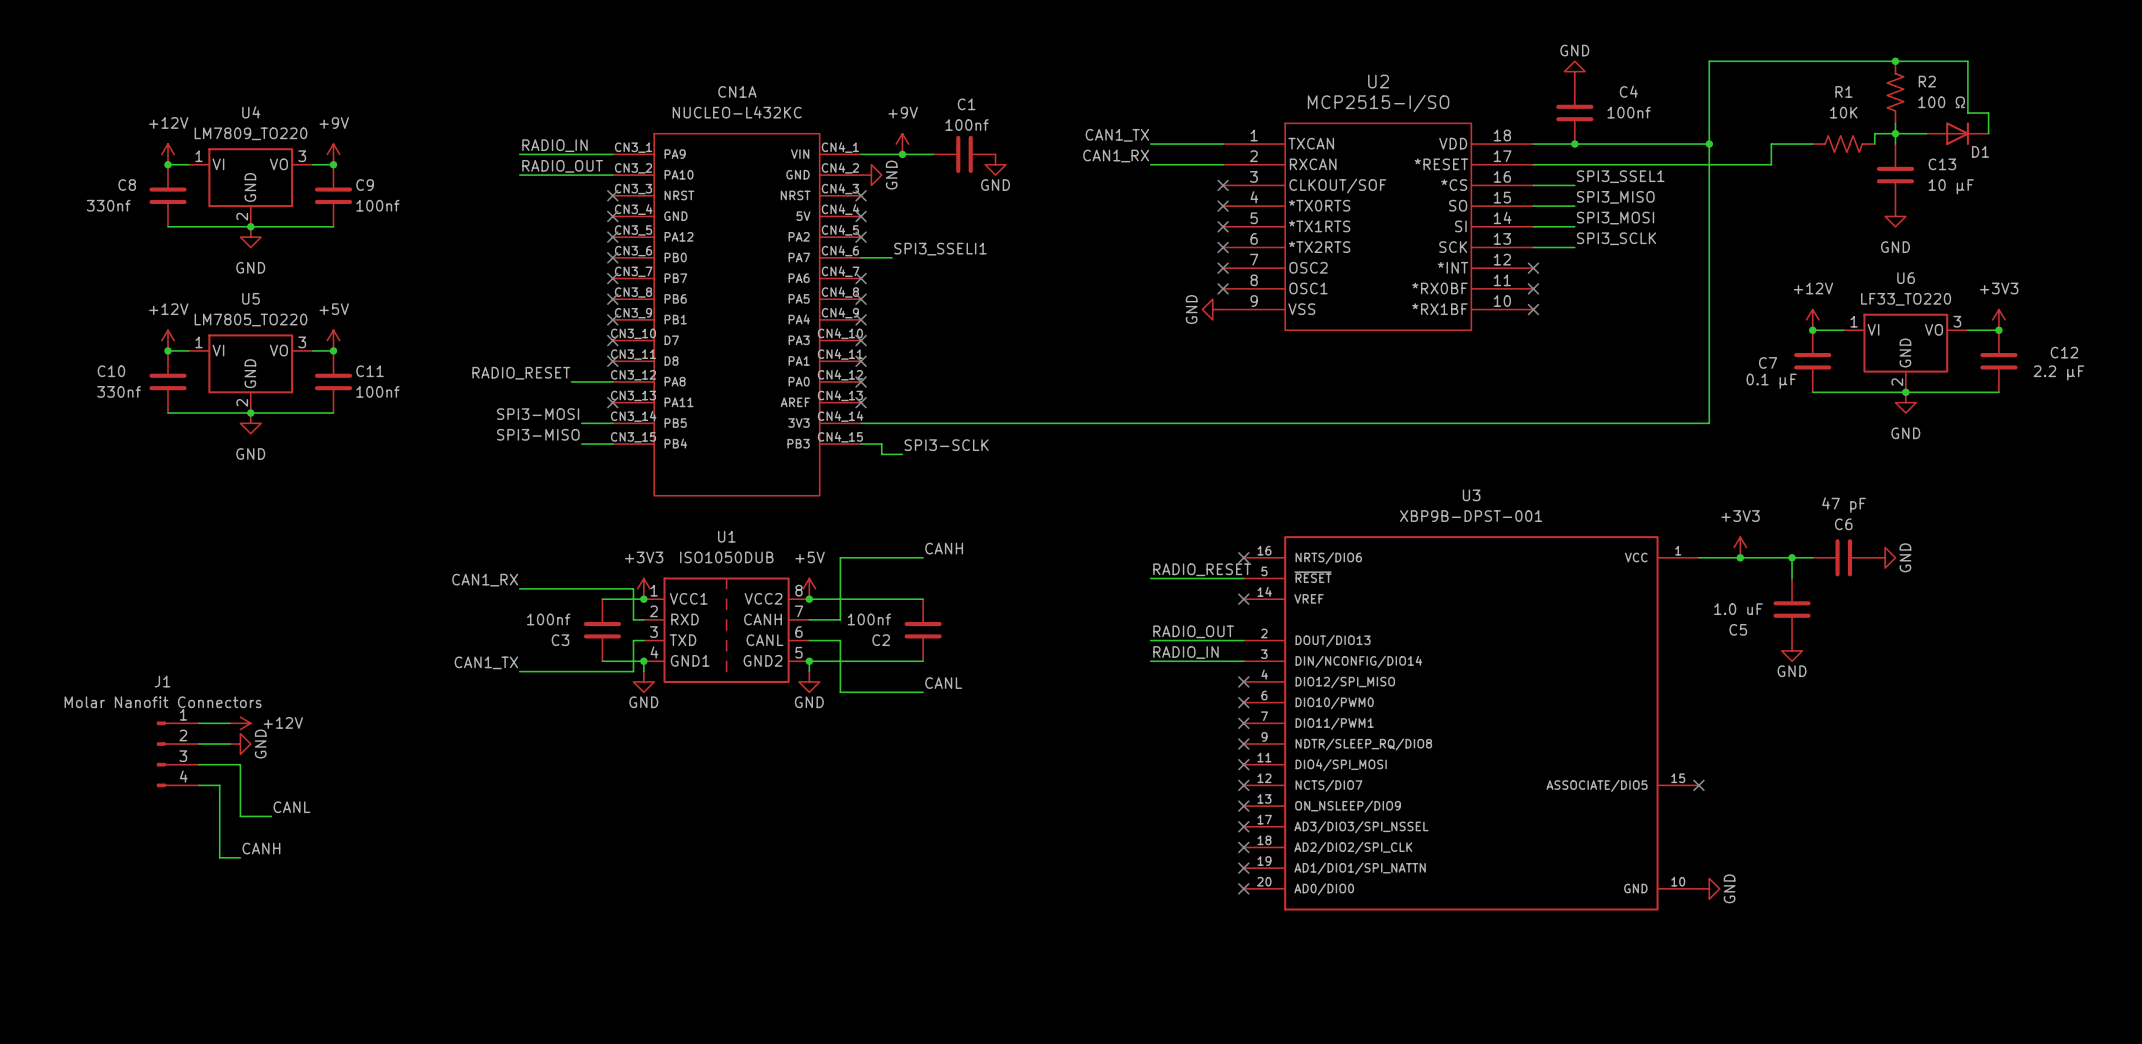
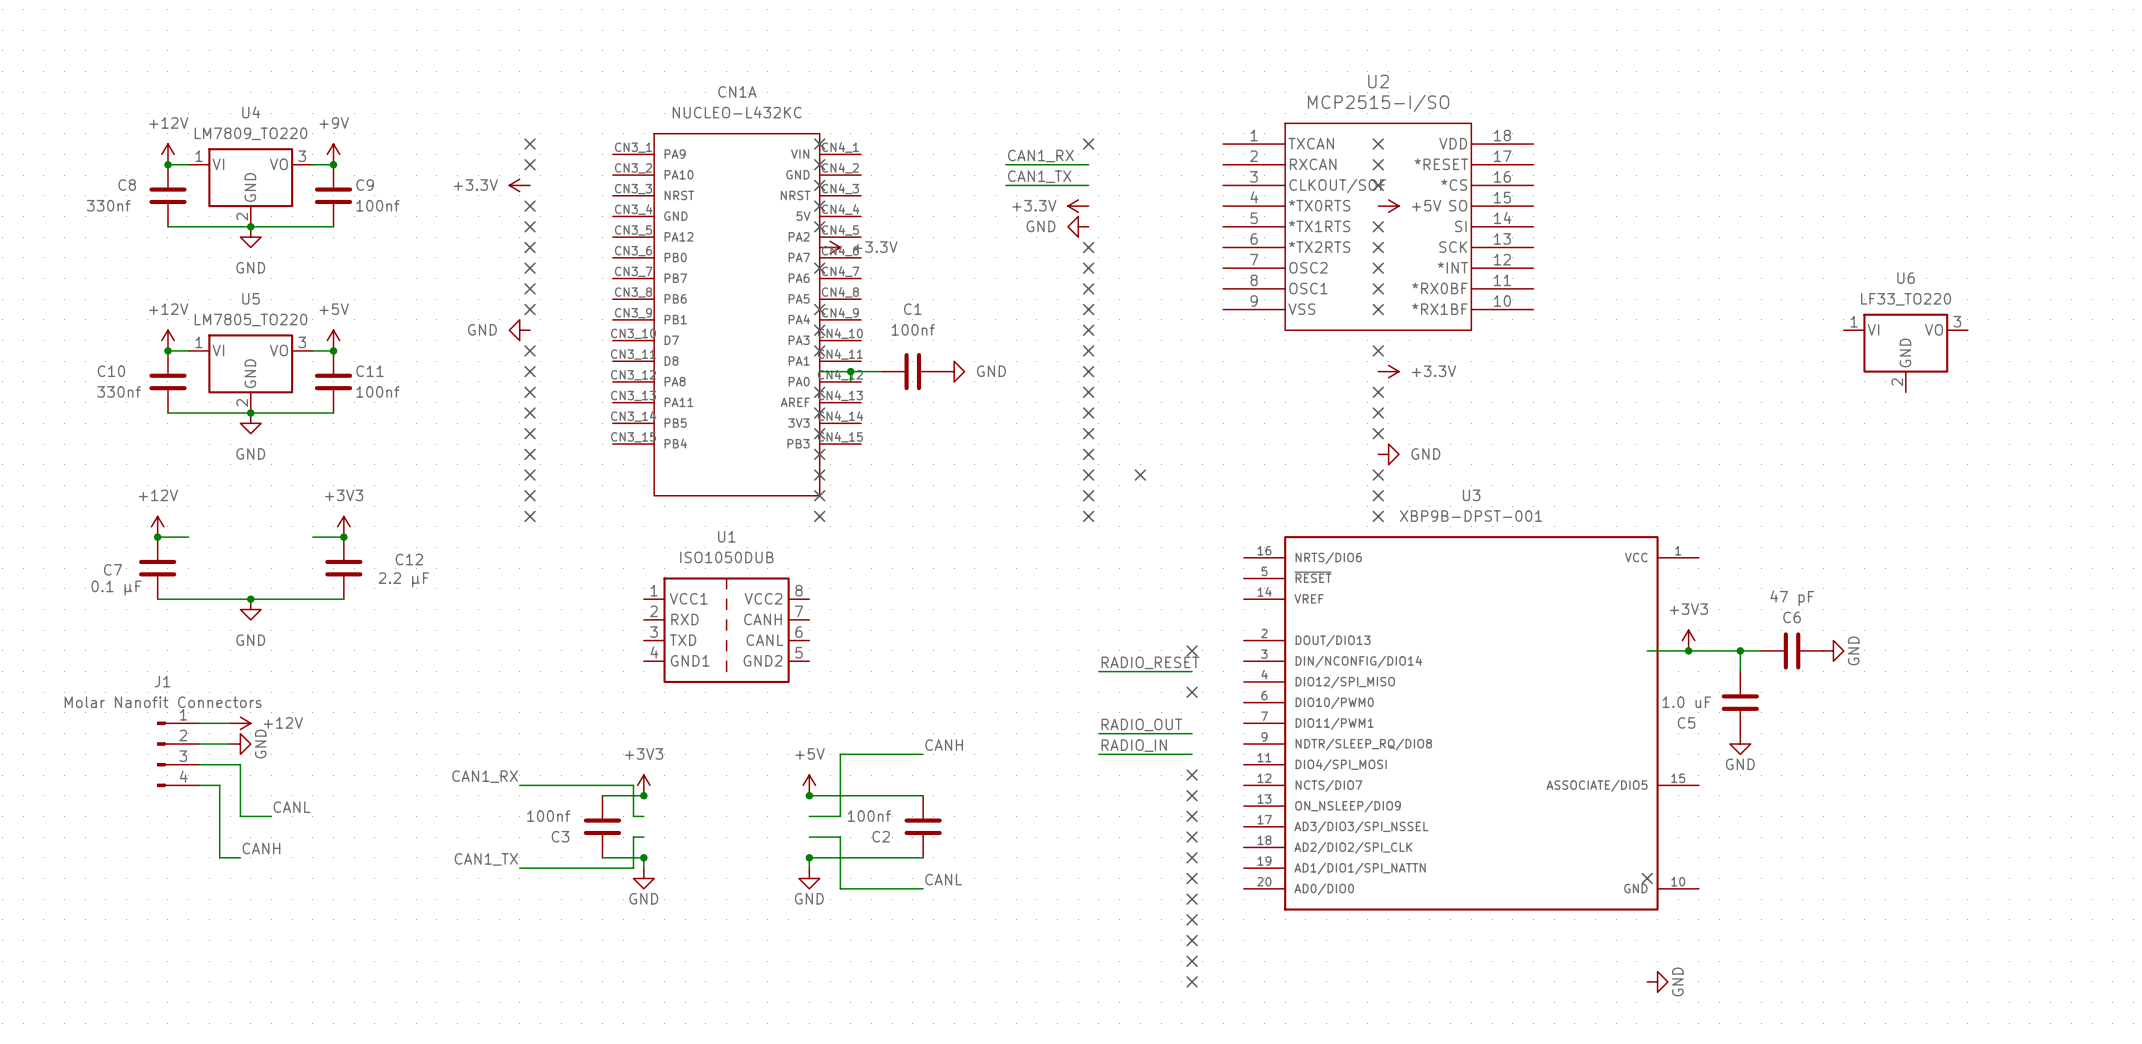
junction: (1895, 61) -> none
power symbol: GND (1574, 71) -> none
R2: 100 Ω (1895, 92) -> none
C1 name position: C1 (966, 104) -> C1 (912, 309)
C4: 100nf (1574, 113) -> none
wire: (1895, 123) (1895, 144) -> none
C1 value position: 100nf (967, 125) -> 100nf (913, 329)
junction: (1895, 133) -> none
wire: (1926, 133) (1874, 133) (1874, 144) -> none
D1: (1957, 133) -> none
wire: (1988, 133) (1988, 113) (1967, 113) (1967, 61) (1709, 61) (1709, 423) (861, 423) -> none
label position: CAN1_TX (1117, 135) -> CAN1_TX (1039, 176)
no-connect mark: none -> (530, 144)
no-connect mark: none -> (819, 144)
power symbol: +9V (902, 144) -> none
no-connect mark: none -> (1088, 144)
wire: (1150, 144) (1223, 144) -> none
no-connect mark: none -> (1378, 144)
wire: (1533, 144) (1709, 144) -> none
junction: (1574, 144) -> none
junction: (1709, 144) -> none
wire: (1812, 144) (1771, 144) (1771, 164) (1533, 164) -> none
R1: 10K (1843, 144) -> none
label: RADIO_IN (555, 145) -> none
wire: (519, 154) (612, 154) -> none
wire: (861, 154) (933, 154) -> none
junction: (902, 154) -> none
C1 position: (964, 154) -> (912, 371)
label position: CAN1_RX (1116, 156) -> CAN1_RX (1040, 156)
no-connect mark: none -> (530, 164)
no-connect mark: none -> (819, 164)
power symbol: GND (995, 164) -> none
wire: none -> (1005, 164) (1088, 164)
wire: (1150, 164) (1223, 164) -> none
no-connect mark: none -> (1378, 164)
label: RADIO_OUT (562, 166) -> none
wire: (519, 175) (612, 175) -> none
power symbol: GND (871, 175) -> none
C13: 10 µF (1895, 175) -> none
label: SPI3_SSEL1 (1620, 176) -> none
power symbol: none -> +3.3V (519, 185)
no-connect mark: none -> (819, 185)
wire: none -> (1005, 185) (1088, 185)
no-connect mark: (1223, 185) -> none
no-connect mark: none -> (1378, 185)
wire: (1533, 185) (1574, 185) -> none
no-connect mark: (612, 195) -> none
no-connect mark: (861, 195) -> none
label: SPI3_MISO (1615, 197) -> none
no-connect mark: none -> (530, 206)
no-connect mark: none -> (819, 206)
power symbol: none -> +3.3V (1078, 206)
no-connect mark: (1223, 206) -> none
power symbol: none -> +5V (1388, 206)
wire: (1533, 206) (1574, 206) -> none
no-connect mark: (612, 216) -> none
no-connect mark: (861, 216) -> none
power symbol: GND (1895, 216) -> none
label: SPI3_MOSI (1615, 218) -> none
no-connect mark: none -> (530, 226)
no-connect mark: none -> (819, 226)
power symbol: none -> GND (1078, 226)
no-connect mark: (1223, 226) -> none
no-connect mark: none -> (1378, 226)
wire: (1533, 226) (1574, 226) -> none
no-connect mark: (612, 237) -> none
no-connect mark: (861, 237) -> none
label: SPI3_SCLK (1616, 238) -> none
no-connect mark: none -> (530, 247)
power symbol: none -> +3.3V (830, 247)
no-connect mark: none -> (1088, 247)
no-connect mark: (1223, 247) -> none
no-connect mark: none -> (1378, 247)
wire: (1533, 247) (1574, 247) -> none
label: SPI3_SSELI1 (940, 249) -> none
no-connect mark: (612, 257) -> none
wire: (861, 257) (892, 257) -> none
no-connect mark: none -> (530, 268)
no-connect mark: none -> (819, 268)
no-connect mark: none -> (1088, 268)
no-connect mark: (1223, 268) -> none
no-connect mark: none -> (1378, 268)
no-connect mark: (1533, 268) -> none
no-connect mark: (612, 278) -> none
no-connect mark: (861, 278) -> none
no-connect mark: none -> (530, 288)
no-connect mark: none -> (1088, 288)
no-connect mark: (1223, 288) -> none
no-connect mark: none -> (1378, 288)
no-connect mark: (1533, 288) -> none
no-connect mark: (612, 299) -> none
no-connect mark: (861, 299) -> none
no-connect mark: none -> (530, 309)
no-connect mark: none -> (819, 309)
no-connect mark: none -> (1088, 309)
power symbol: GND (1212, 309) -> none
no-connect mark: none -> (1378, 309)
no-connect mark: (1533, 309) -> none
no-connect mark: (612, 319) -> none
no-connect mark: (861, 319) -> none
power symbol: +12V (1812, 319) -> none
power symbol: +3V3 (1998, 319) -> none
power symbol: none -> GND (519, 330)
no-connect mark: none -> (819, 330)
no-connect mark: none -> (1088, 330)
wire: (1812, 330) (1843, 330) -> none
junction: (1812, 330) -> none
wire: (1967, 330) (1998, 330) -> none
junction: (1998, 330) -> none
no-connect mark: (612, 340) -> none
no-connect mark: (861, 340) -> none
no-connect mark: none -> (530, 350)
no-connect mark: none -> (819, 350)
no-connect mark: none -> (1088, 350)
no-connect mark: none -> (1378, 350)
no-connect mark: (612, 361) -> none
no-connect mark: (861, 361) -> none
C7 position: (1812, 361) -> (157, 568)
C12 position: (1998, 361) -> (343, 568)
no-connect mark: none -> (530, 371)
wire: none -> (819, 371) (881, 371)
wire: none -> (850, 371) (850, 381)
junction: none -> (850, 371)
power symbol: none -> GND (954, 371)
no-connect mark: none -> (1088, 371)
power symbol: none -> +3.3V (1388, 371)
label: RADIO_RESET (521, 373) -> none
wire: (571, 381) (612, 381) -> none
no-connect mark: (861, 381) -> none
no-connect mark: none -> (530, 392)
no-connect mark: none -> (819, 392)
no-connect mark: none -> (1088, 392)
no-connect mark: none -> (1378, 392)
wire: (1812, 392) (1998, 392) -> none
junction: (1905, 392) -> none
no-connect mark: (612, 402) -> none
no-connect mark: (861, 402) -> none
power symbol: GND (1905, 402) -> none
no-connect mark: none -> (530, 413)
no-connect mark: none -> (819, 413)
no-connect mark: none -> (1088, 413)
no-connect mark: none -> (1378, 413)
label: SPI3-MOSI (538, 414) -> none
wire: (581, 423) (612, 423) -> none
no-connect mark: none -> (530, 433)
no-connect mark: none -> (819, 433)
no-connect mark: none -> (1088, 433)
no-connect mark: none -> (1378, 433)
label: SPI3-MISO (538, 434) -> none
wire: (581, 444) (612, 444) -> none
wire: (861, 444) (881, 444) (881, 454) (902, 454) -> none
label: SPI3-SCLK (946, 445) -> none
no-connect mark: none -> (530, 454)
no-connect mark: none -> (819, 454)
no-connect mark: none -> (1088, 454)
power symbol: none -> GND (1388, 454)
no-connect mark: none -> (530, 475)
no-connect mark: none -> (819, 475)
no-connect mark: none -> (1088, 475)
no-connect mark: none -> (1140, 475)
no-connect mark: none -> (1378, 475)
no-connect mark: none -> (530, 495)
no-connect mark: none -> (819, 495)
no-connect mark: none -> (1088, 495)
no-connect mark: none -> (1378, 495)
no-connect mark: none -> (530, 516)
no-connect mark: none -> (819, 516)
no-connect mark: none -> (1088, 516)
no-connect mark: none -> (1378, 516)
power symbol: none -> +12V (157, 526)
power symbol: none -> +3V3 (343, 526)
wire: none -> (157, 537) (188, 537)
junction: none -> (157, 537)
wire: none -> (312, 537) (343, 537)
junction: none -> (343, 537)
power symbol position: +3V3 (1740, 547) -> +3V3 (1688, 640)
label position: CANH (944, 548) -> CANH (944, 745)
wire: (923, 557) (840, 557) (840, 619) (809, 619) -> (923, 754) (840, 754) (840, 816) (809, 816)
no-connect mark: (1243, 557) -> none
wire: (1698, 557) (1812, 557) -> (1647, 650) (1761, 650)
junction: (1740, 557) -> none
wire: (1792, 557) (1792, 578) -> (1740, 650) (1740, 671)
junction: (1792, 557) -> none
C6 position: (1843, 557) -> (1792, 650)
power symbol: GND (1885, 557) -> none
label position: RADIO_RESET (1202, 569) -> RADIO_RESET (1150, 662)
wire: (1150, 578) (1243, 578) -> (1098, 671) (1192, 671)
label position: CAN1_RX (485, 580) -> CAN1_RX (485, 776)
wire: (519, 588) (633, 588) (633, 619) (643, 619) -> (519, 785) (633, 785) (633, 816) (643, 816)
power symbol: +3V3 (643, 588) -> none
power symbol position: +5V (809, 588) -> +5V (809, 785)
wire: none -> (157, 599) (343, 599)
junction: none -> (250, 599)
wire: (602, 599) (643, 599) -> (602, 795) (643, 795)
junction: (643, 599) -> none
wire: (809, 599) (923, 599) -> (809, 795) (923, 795)
junction: (809, 599) -> none
no-connect mark: (1243, 599) -> none
power symbol: none -> GND (250, 609)
C5 position: (1792, 609) -> (1740, 702)
C3 position: (602, 630) -> (602, 826)
C2 position: (923, 630) -> (923, 826)
label position: RADIO_OUT (1193, 631) -> RADIO_OUT (1141, 724)
wire: (643, 640) (633, 640) (633, 671) (519, 671) -> (643, 837) (633, 837) (633, 868) (519, 868)
wire: (809, 640) (840, 640) (840, 692) (923, 692) -> (809, 837) (840, 837) (840, 888) (923, 888)
wire: (1150, 640) (1243, 640) -> (1098, 733) (1192, 733)
no-connect mark: none -> (1192, 650)
junction: none -> (1688, 650)
junction: none -> (1740, 650)
power symbol rotation: 0° (1792, 650) -> 90° counterclockwise (1833, 650)
power symbol position: GND (1792, 650) -> GND (1833, 650)
label position: RADIO_IN (1185, 652) -> RADIO_IN (1134, 745)
wire: (602, 661) (643, 661) (643, 671) -> (602, 857) (643, 857) (643, 868)
junction: (643, 661) -> none
junction: (809, 661) -> none
wire: (923, 661) (809, 661) (809, 671) -> (923, 857) (809, 857) (809, 868)
wire: (1150, 661) (1243, 661) -> (1098, 754) (1192, 754)
label position: CAN1_TX (486, 662) -> CAN1_TX (486, 859)
power symbol: GND (643, 681) -> none
power symbol: GND (809, 681) -> none
no-connect mark: (1243, 681) -> none
label position: CANL (943, 683) -> CANL (943, 879)
no-connect mark: none -> (1192, 692)
no-connect mark: (1243, 702) -> none
no-connect mark: (1243, 723) -> none
no-connect mark: (1243, 744) -> none
power symbol: none -> GND (1740, 744)
no-connect mark: (1243, 764) -> none
no-connect mark: none -> (1192, 775)
power symbol: none -> +3V3 (643, 785)
no-connect mark: (1243, 785) -> none
no-connect mark: (1698, 785) -> none
junction: none -> (643, 795)
junction: none -> (809, 795)
no-connect mark: none -> (1192, 795)
no-connect mark: (1243, 806) -> none
no-connect mark: none -> (1192, 816)
no-connect mark: (1243, 826) -> none
no-connect mark: none -> (1192, 837)
no-connect mark: (1243, 847) -> none
junction: none -> (643, 857)
junction: none -> (809, 857)
no-connect mark: none -> (1192, 857)
no-connect mark: (1243, 868) -> none
power symbol: none -> GND (643, 878)
power symbol: none -> GND (809, 878)
no-connect mark: none -> (1192, 878)
no-connect mark: none -> (1647, 878)
no-connect mark: (1243, 888) -> none
power symbol: GND (1709, 888) -> none
no-connect mark: none -> (1192, 899)
no-connect mark: none -> (1192, 919)
no-connect mark: none -> (1192, 940)
no-connect mark: none -> (1192, 961)
no-connect mark: none -> (1192, 981)
power symbol: none -> GND (1657, 981)

